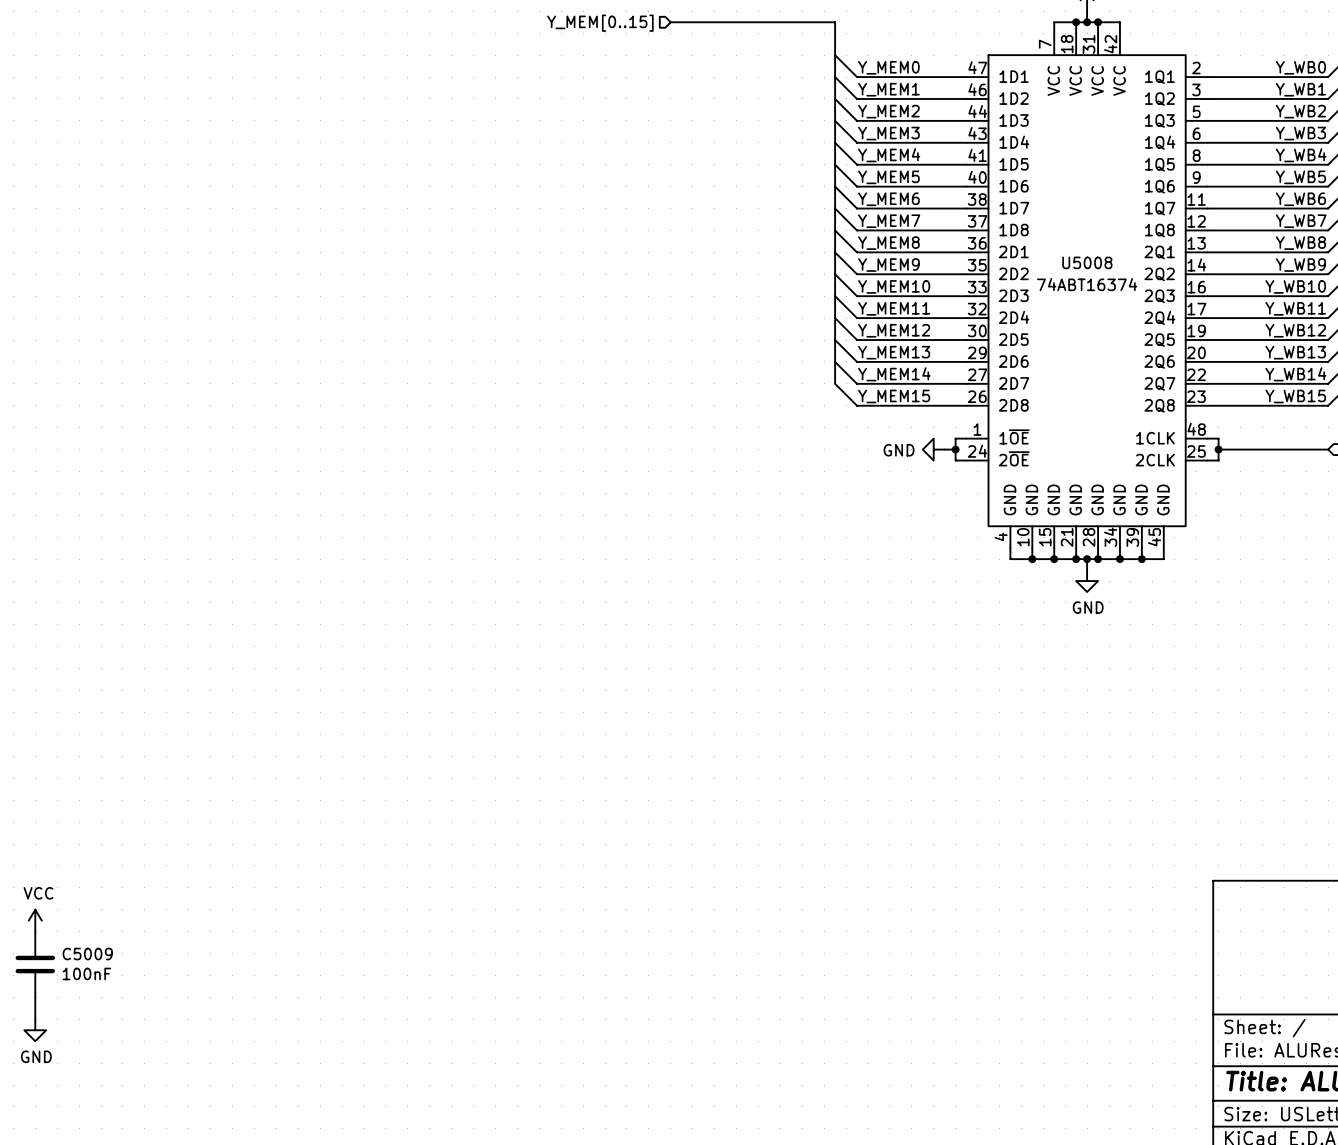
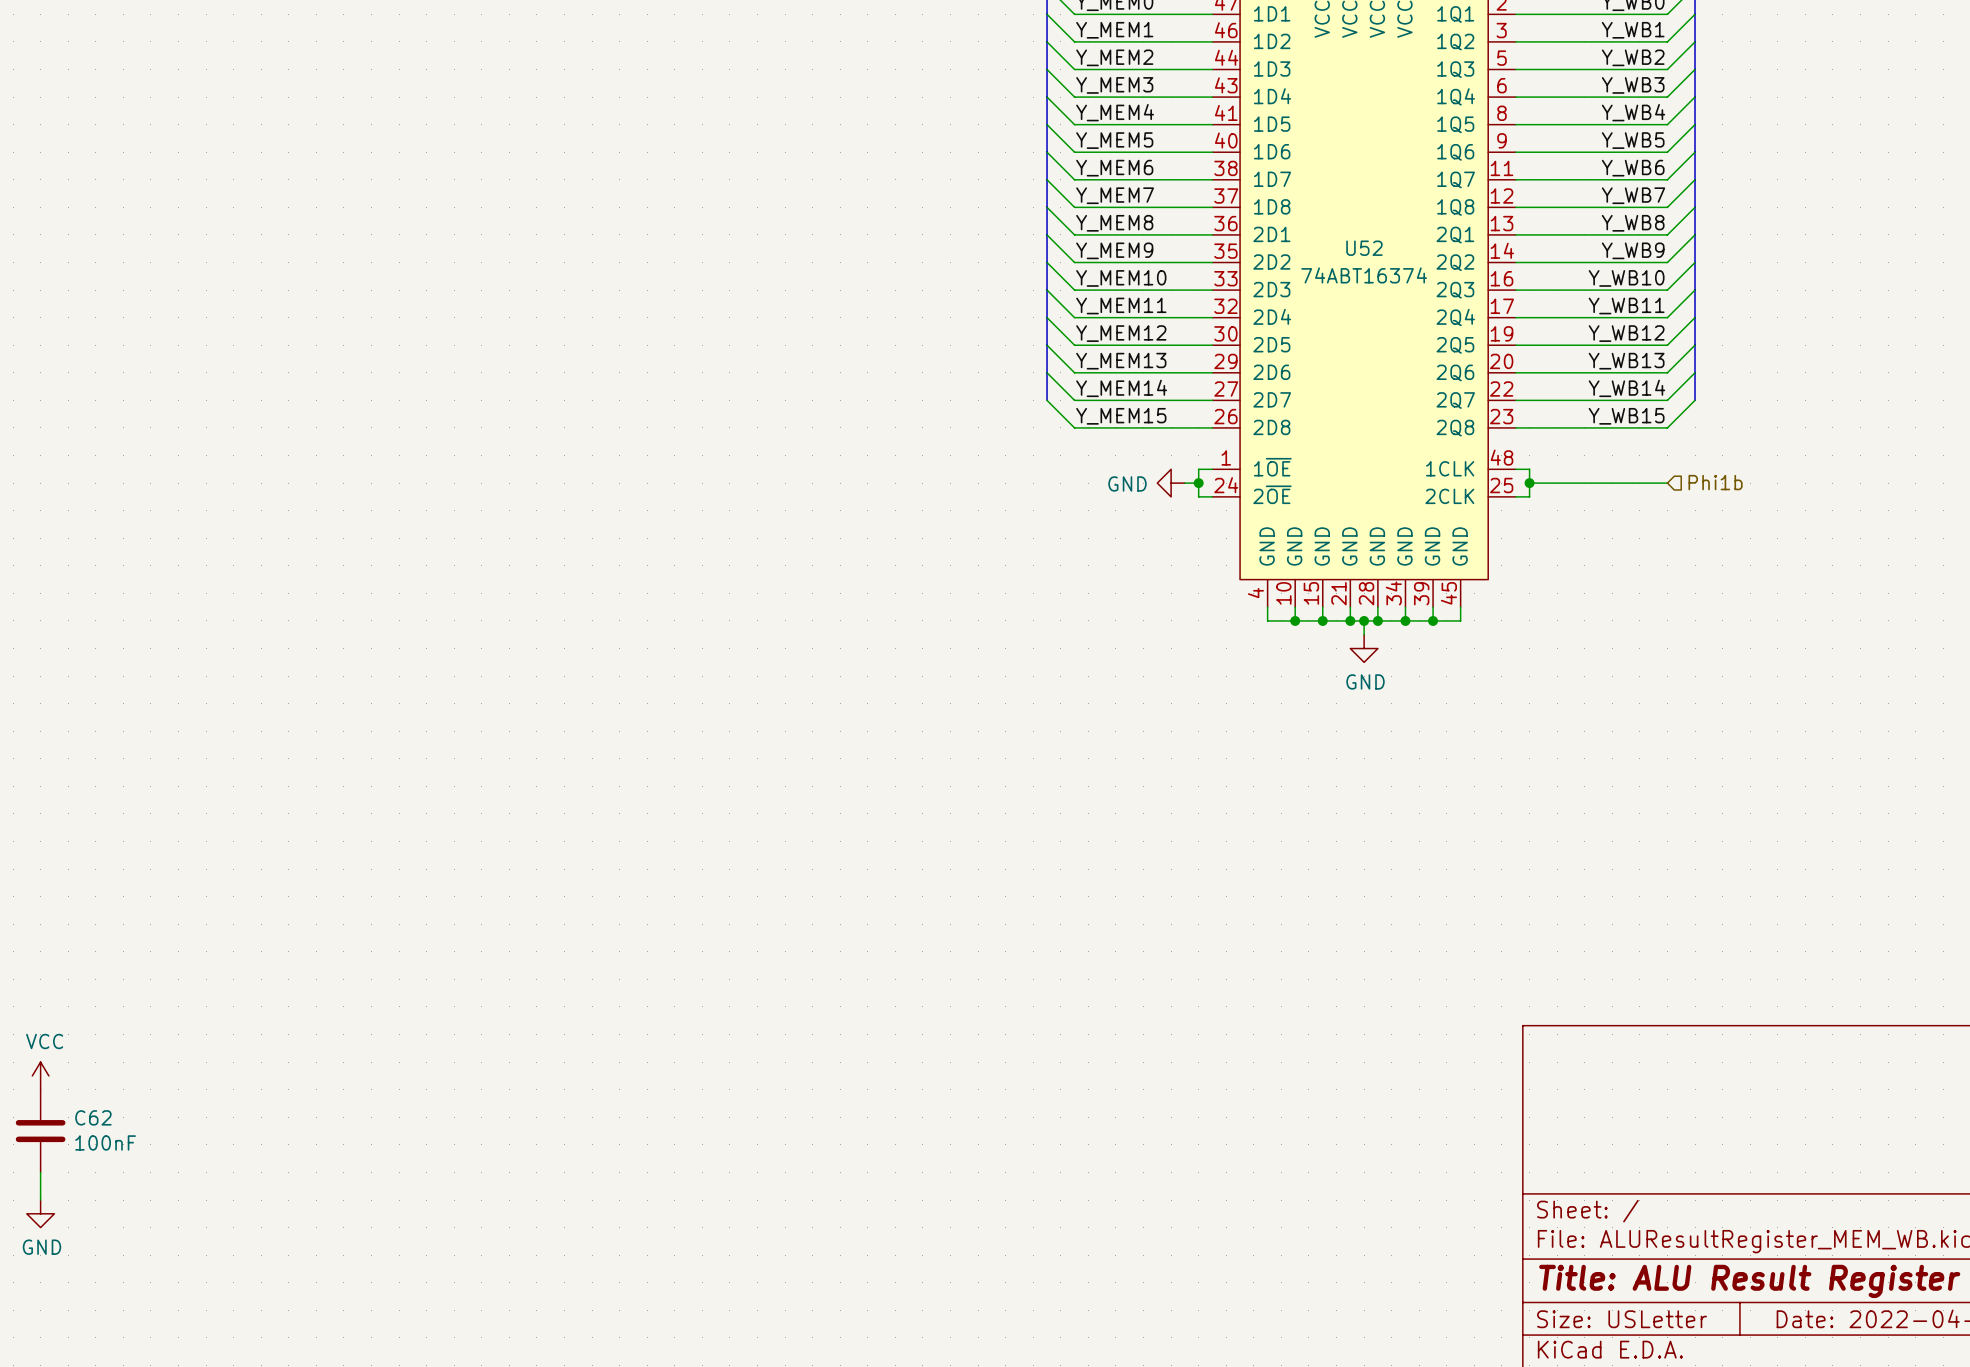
U5008 name: U5008 (1087, 262) -> U52 (1364, 248)
C5009 name: C5009 (87, 954) -> C62 (93, 1117)

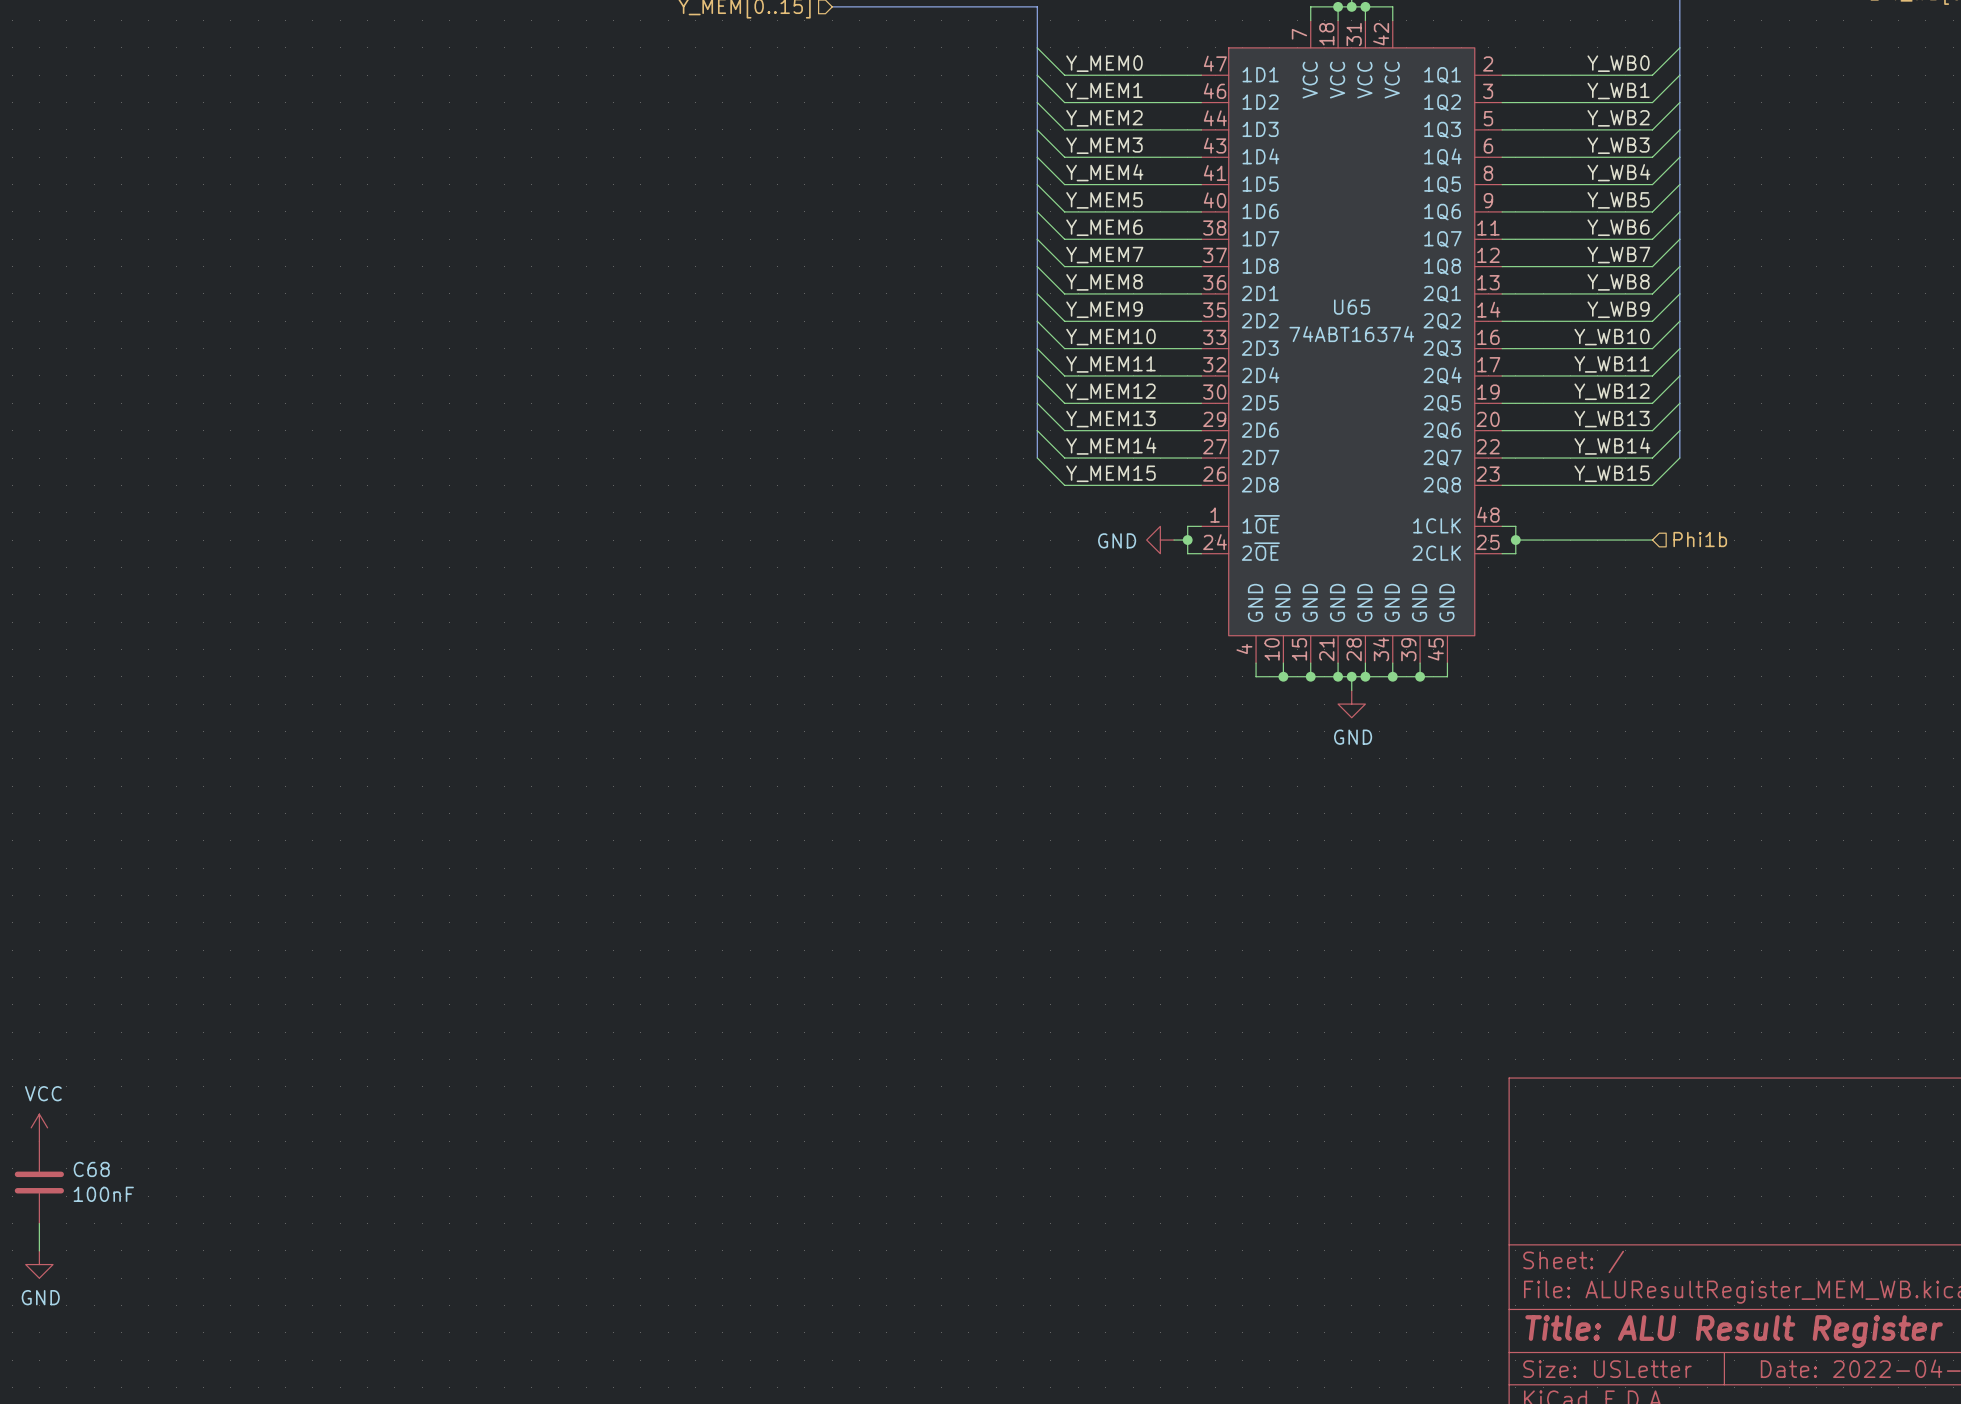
U52 name: U52 (1364, 248) -> U65 (1352, 307)
C62 name: C62 (93, 1117) -> C68 (91, 1169)

